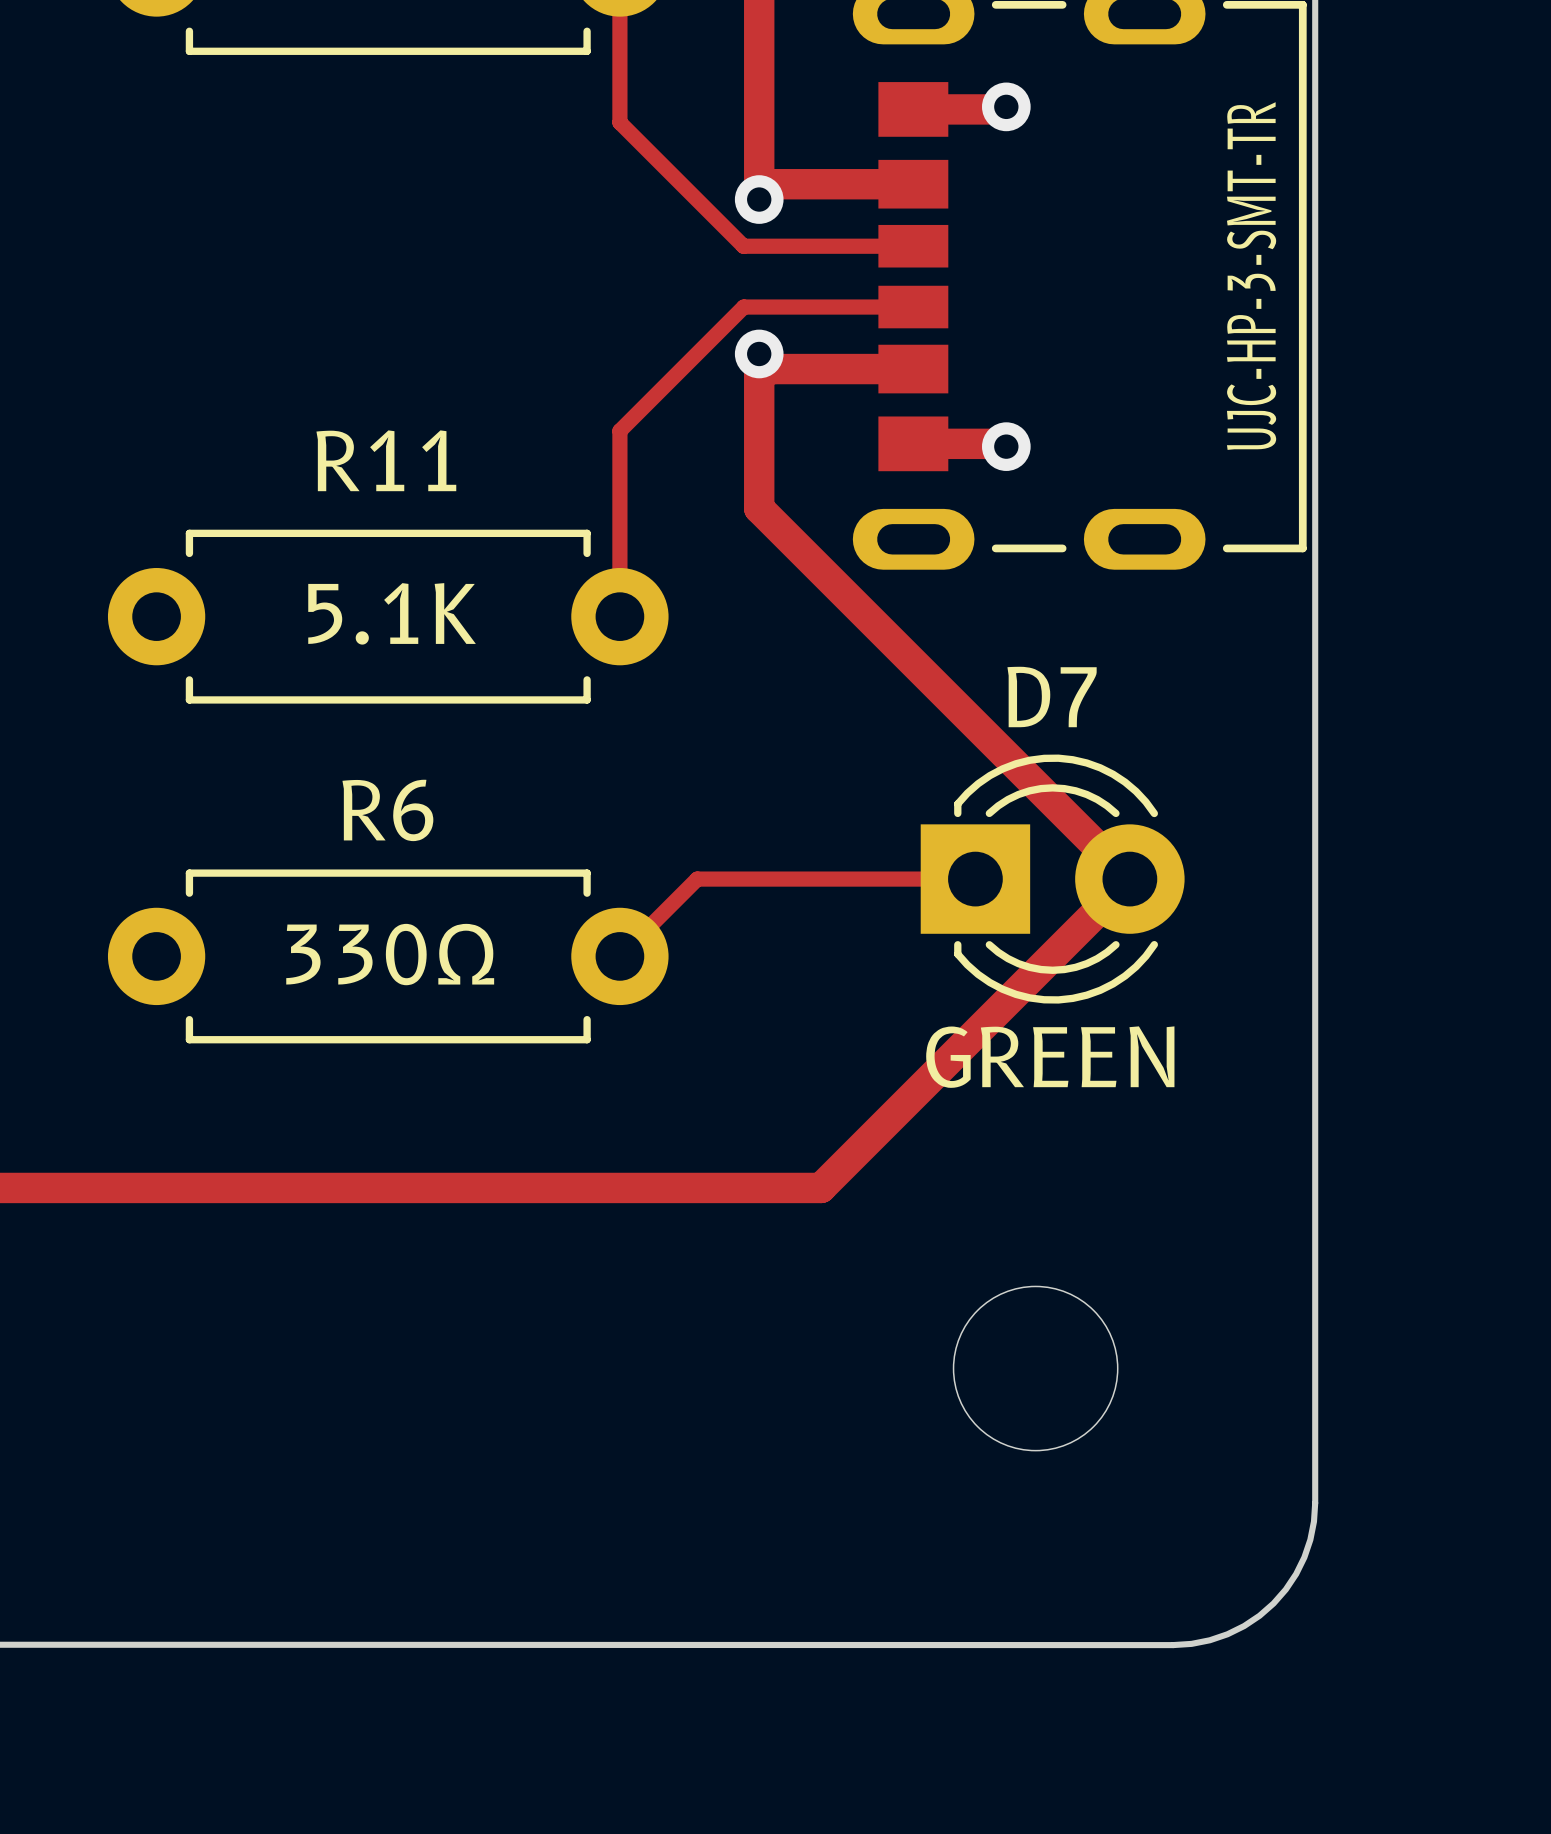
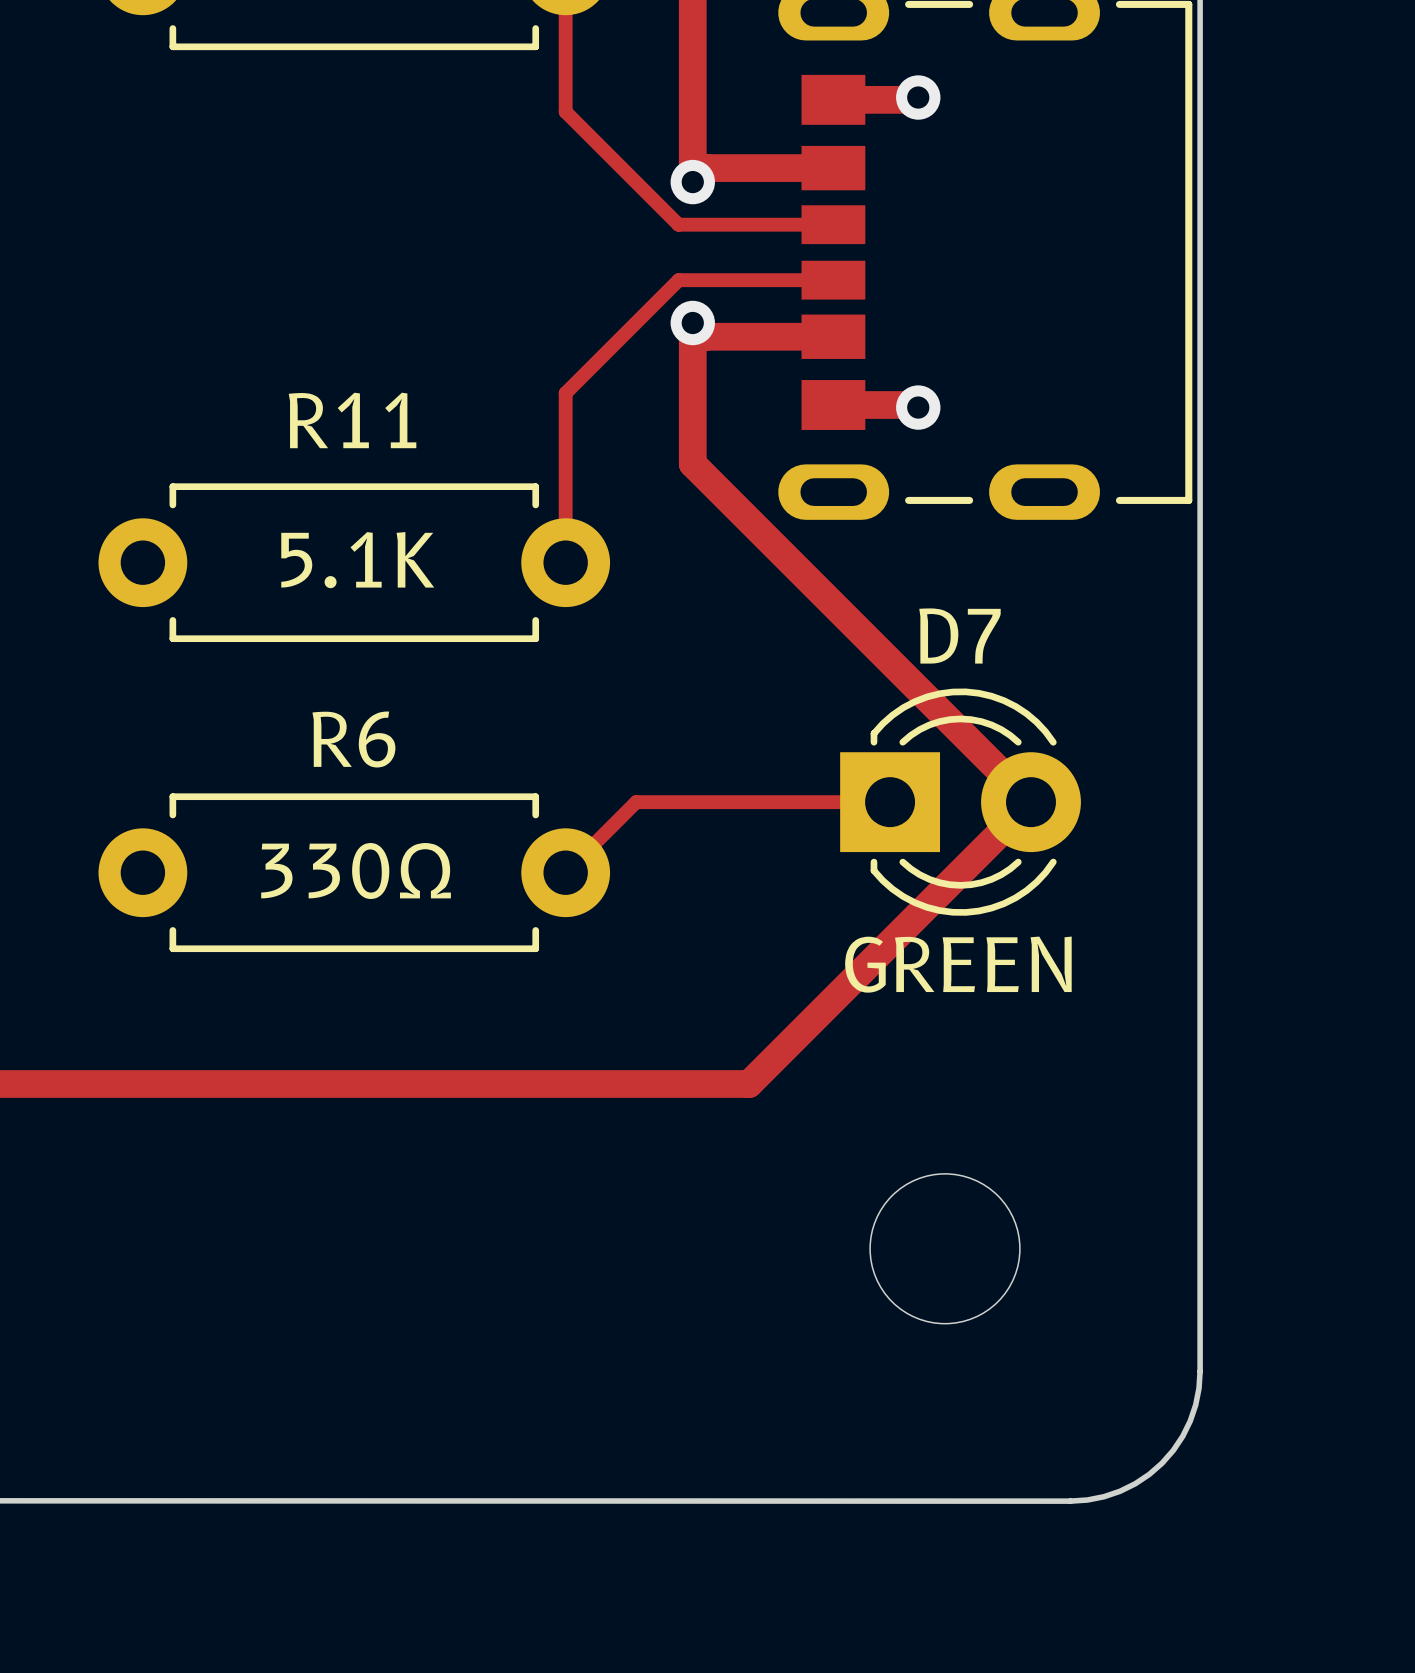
part value: UJC-HP-3-SMT-TR (1251, 276) -> none

